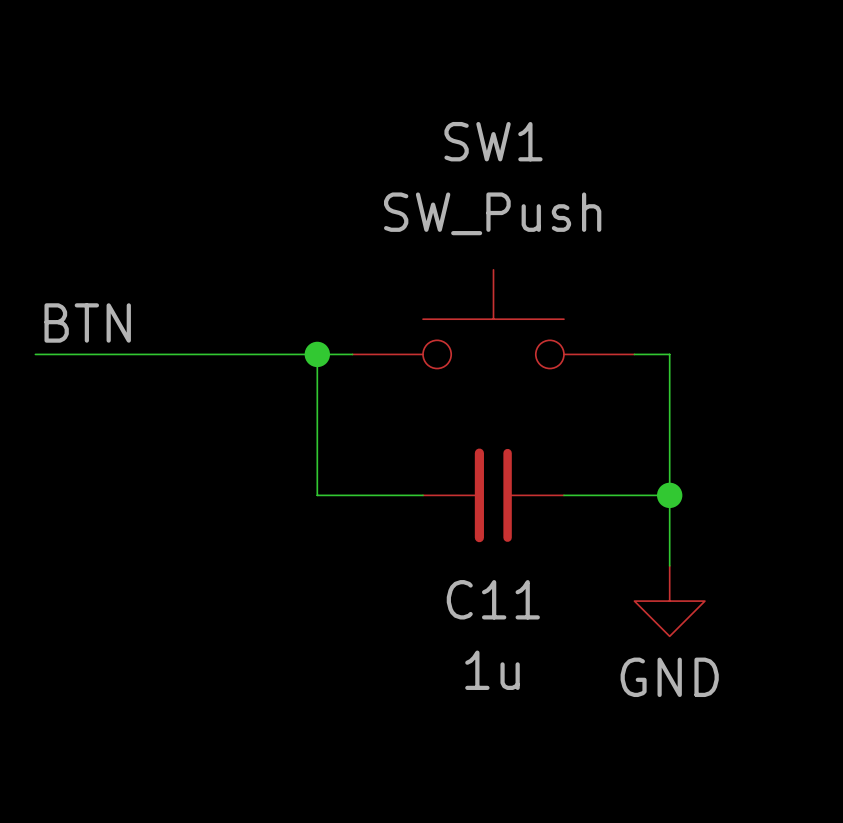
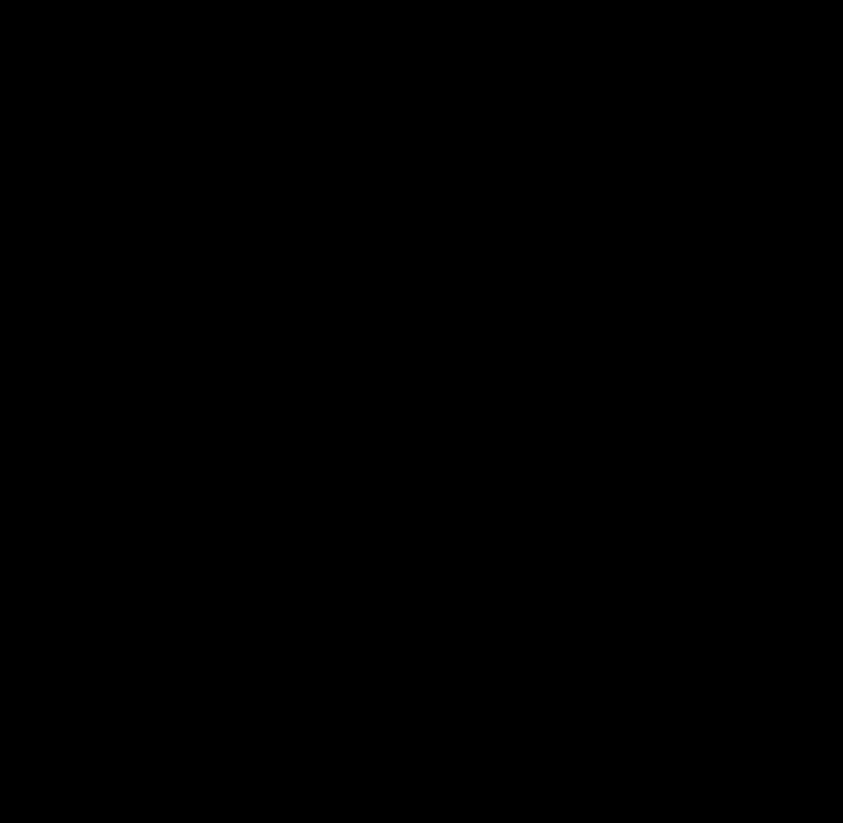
SW1: SW_Push (493, 319) -> none
label: BTN (87, 322) -> none
wire: (35, 354) (352, 354) -> none
wire: (317, 354) (317, 495) (423, 495) -> none
junction: (317, 354) -> none
wire: (634, 354) (669, 354) (669, 565) -> none
C11: 1u (493, 495) -> none
wire: (563, 495) (669, 495) -> none
junction: (669, 495) -> none
power symbol: GND (669, 601) -> none

